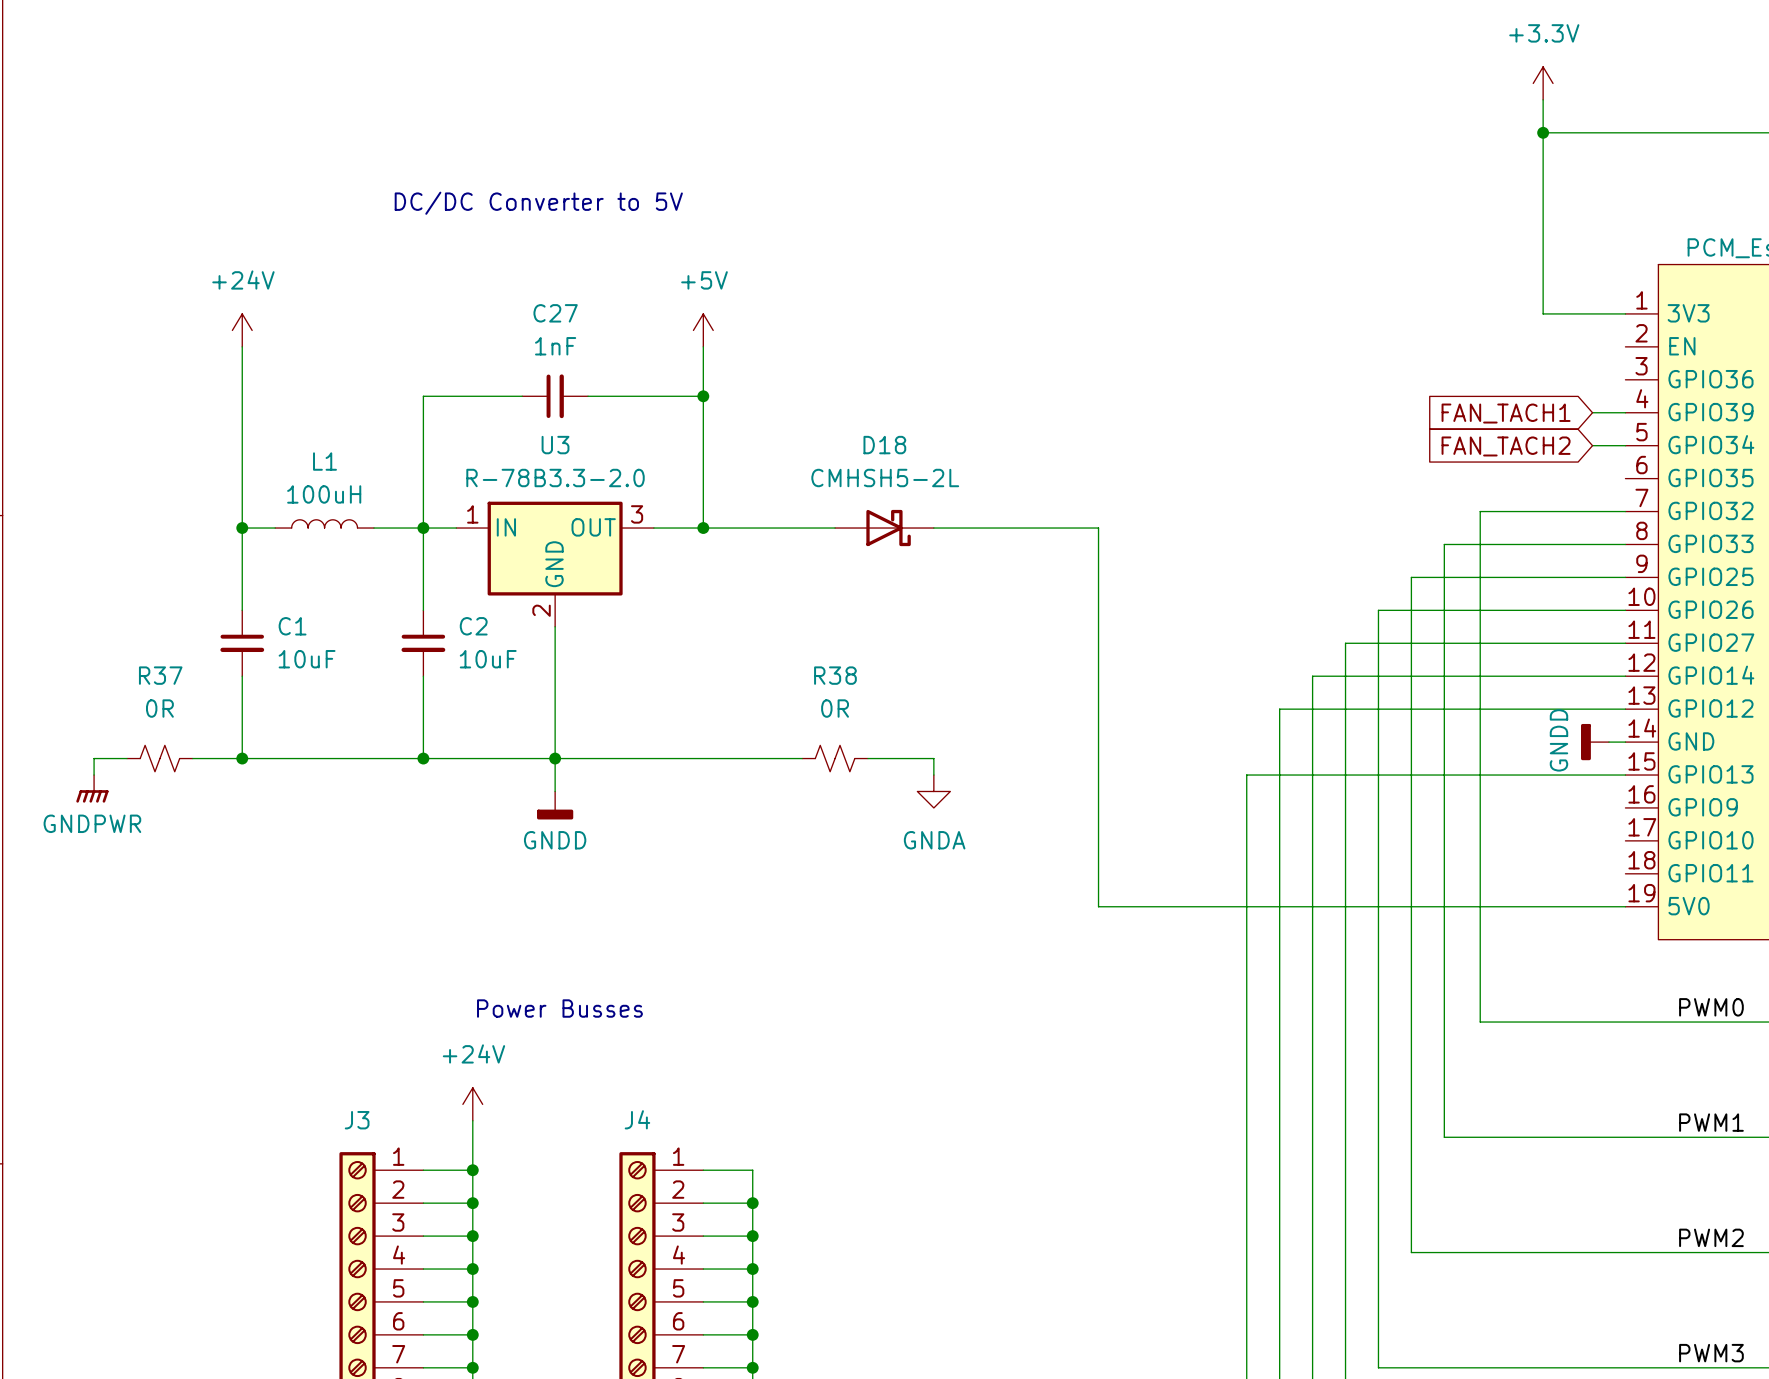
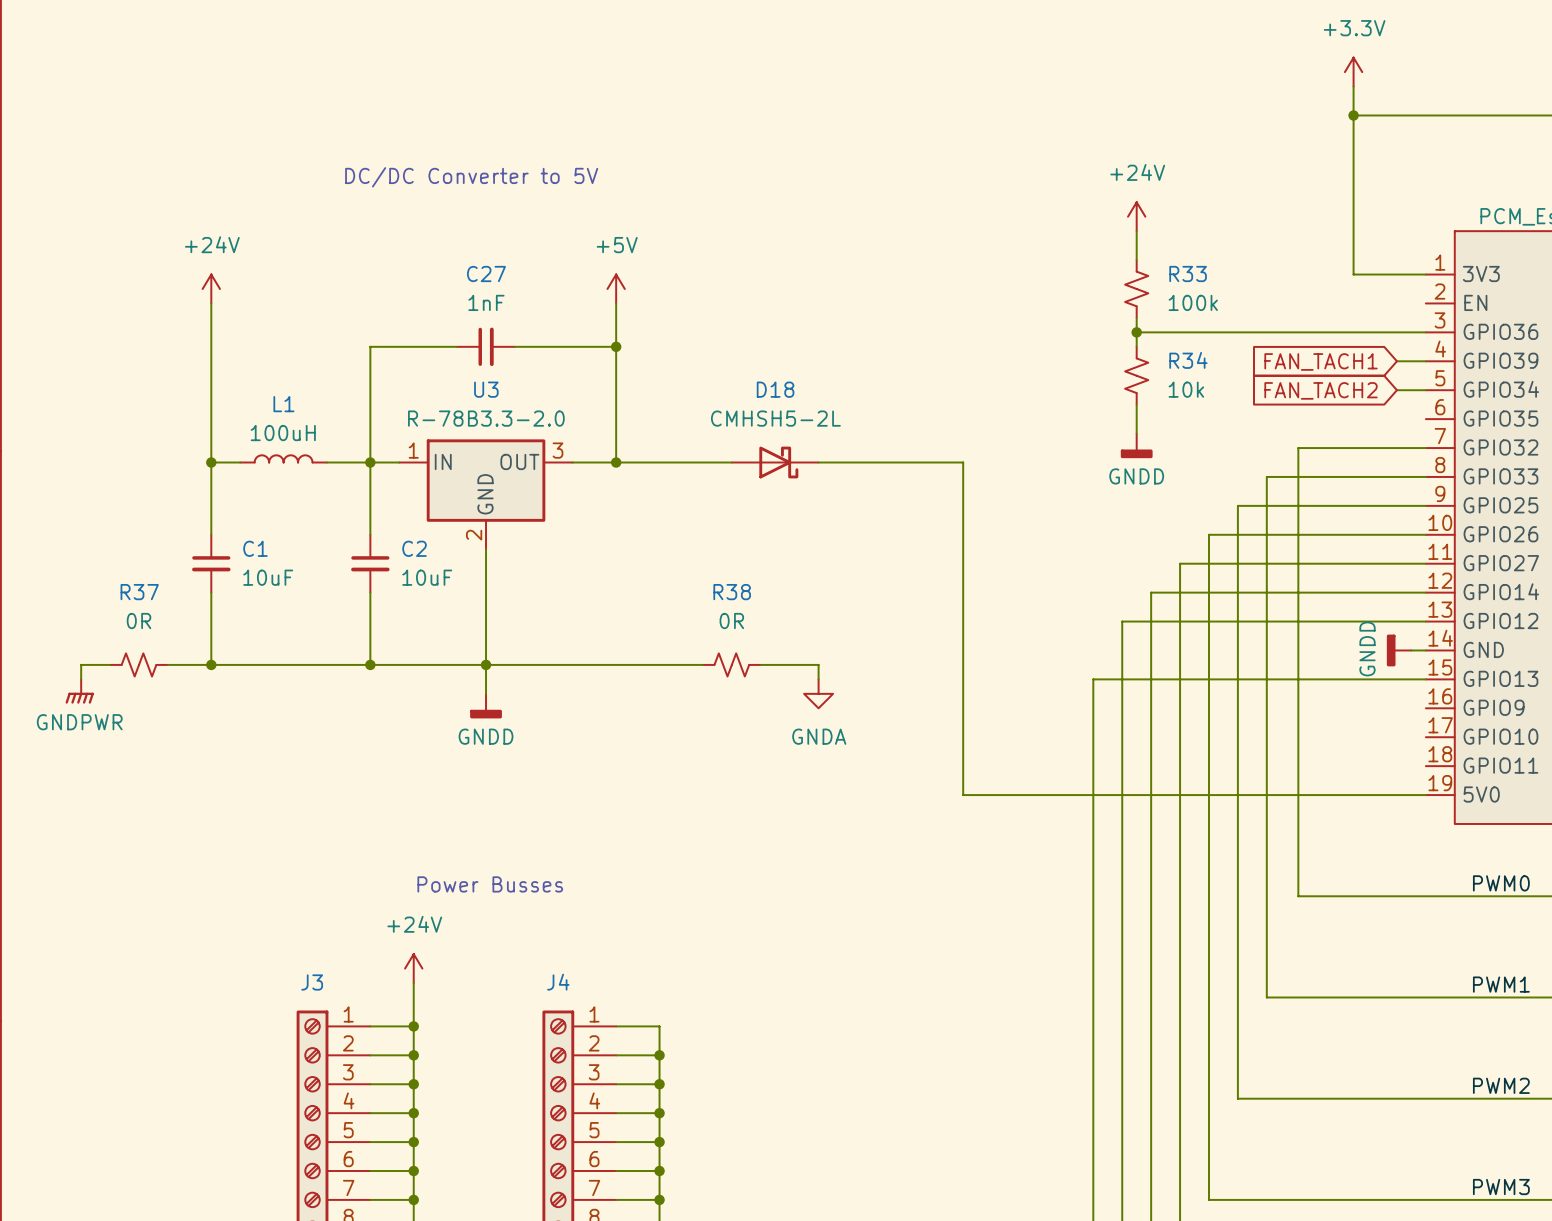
power symbol: none -> +24V (1136, 216)
wire: none -> (1136, 231) (1136, 260)
R33: none -> 100k (1136, 288)
wire: none -> (1136, 317) (1136, 346)
wire: none -> (1136, 332) (1425, 332)
junction: none -> (1136, 332)
R34: none -> 10k (1136, 375)
wire: none -> (1136, 404) (1136, 433)
power symbol: none -> GNDD (1136, 445)

